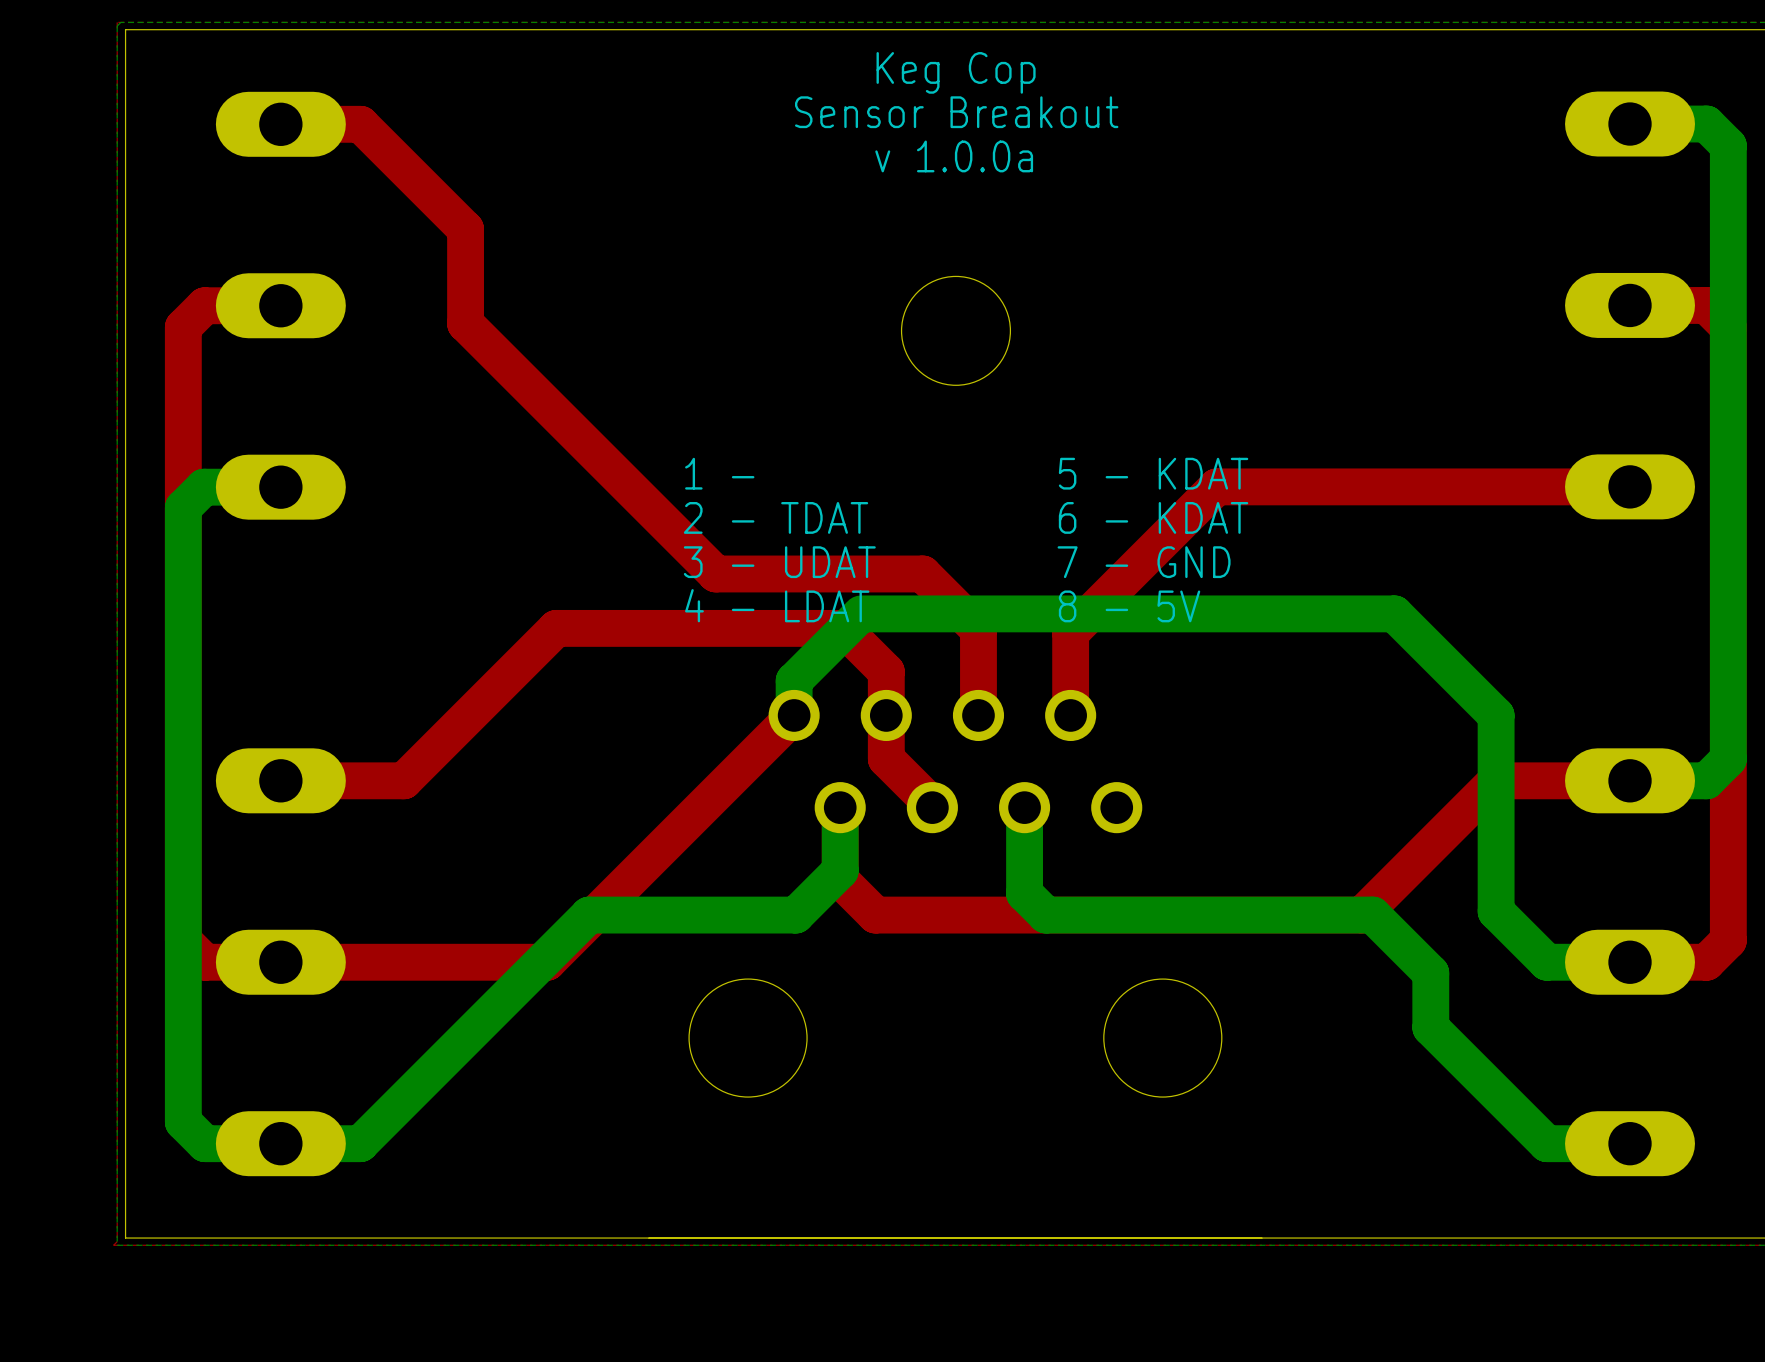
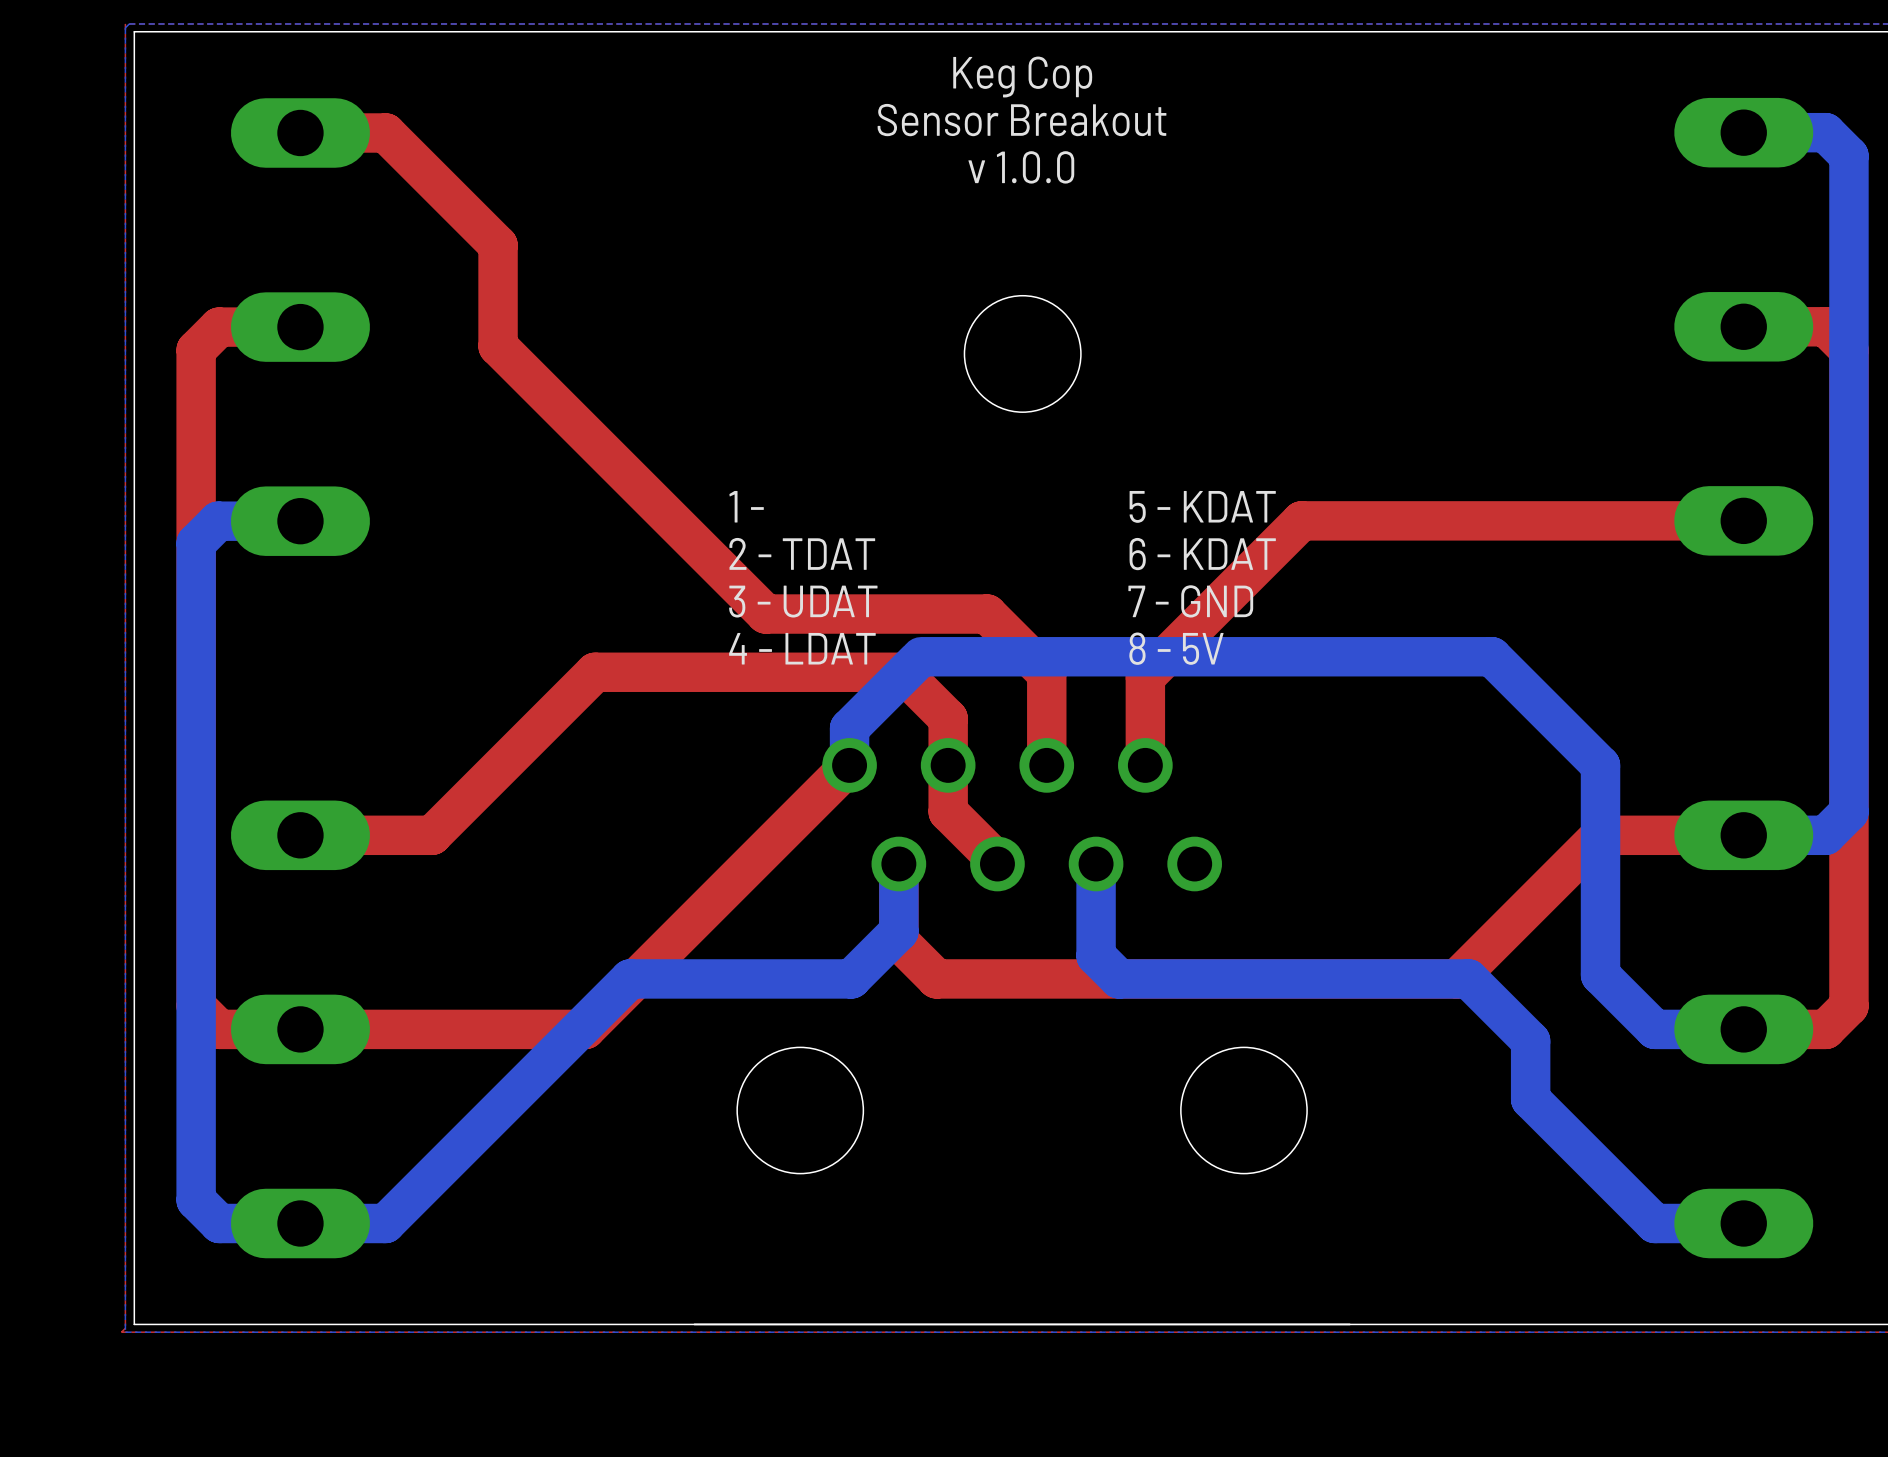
text: v 1.0.0a (954, 156) -> v 1.0.0 (1021, 167)

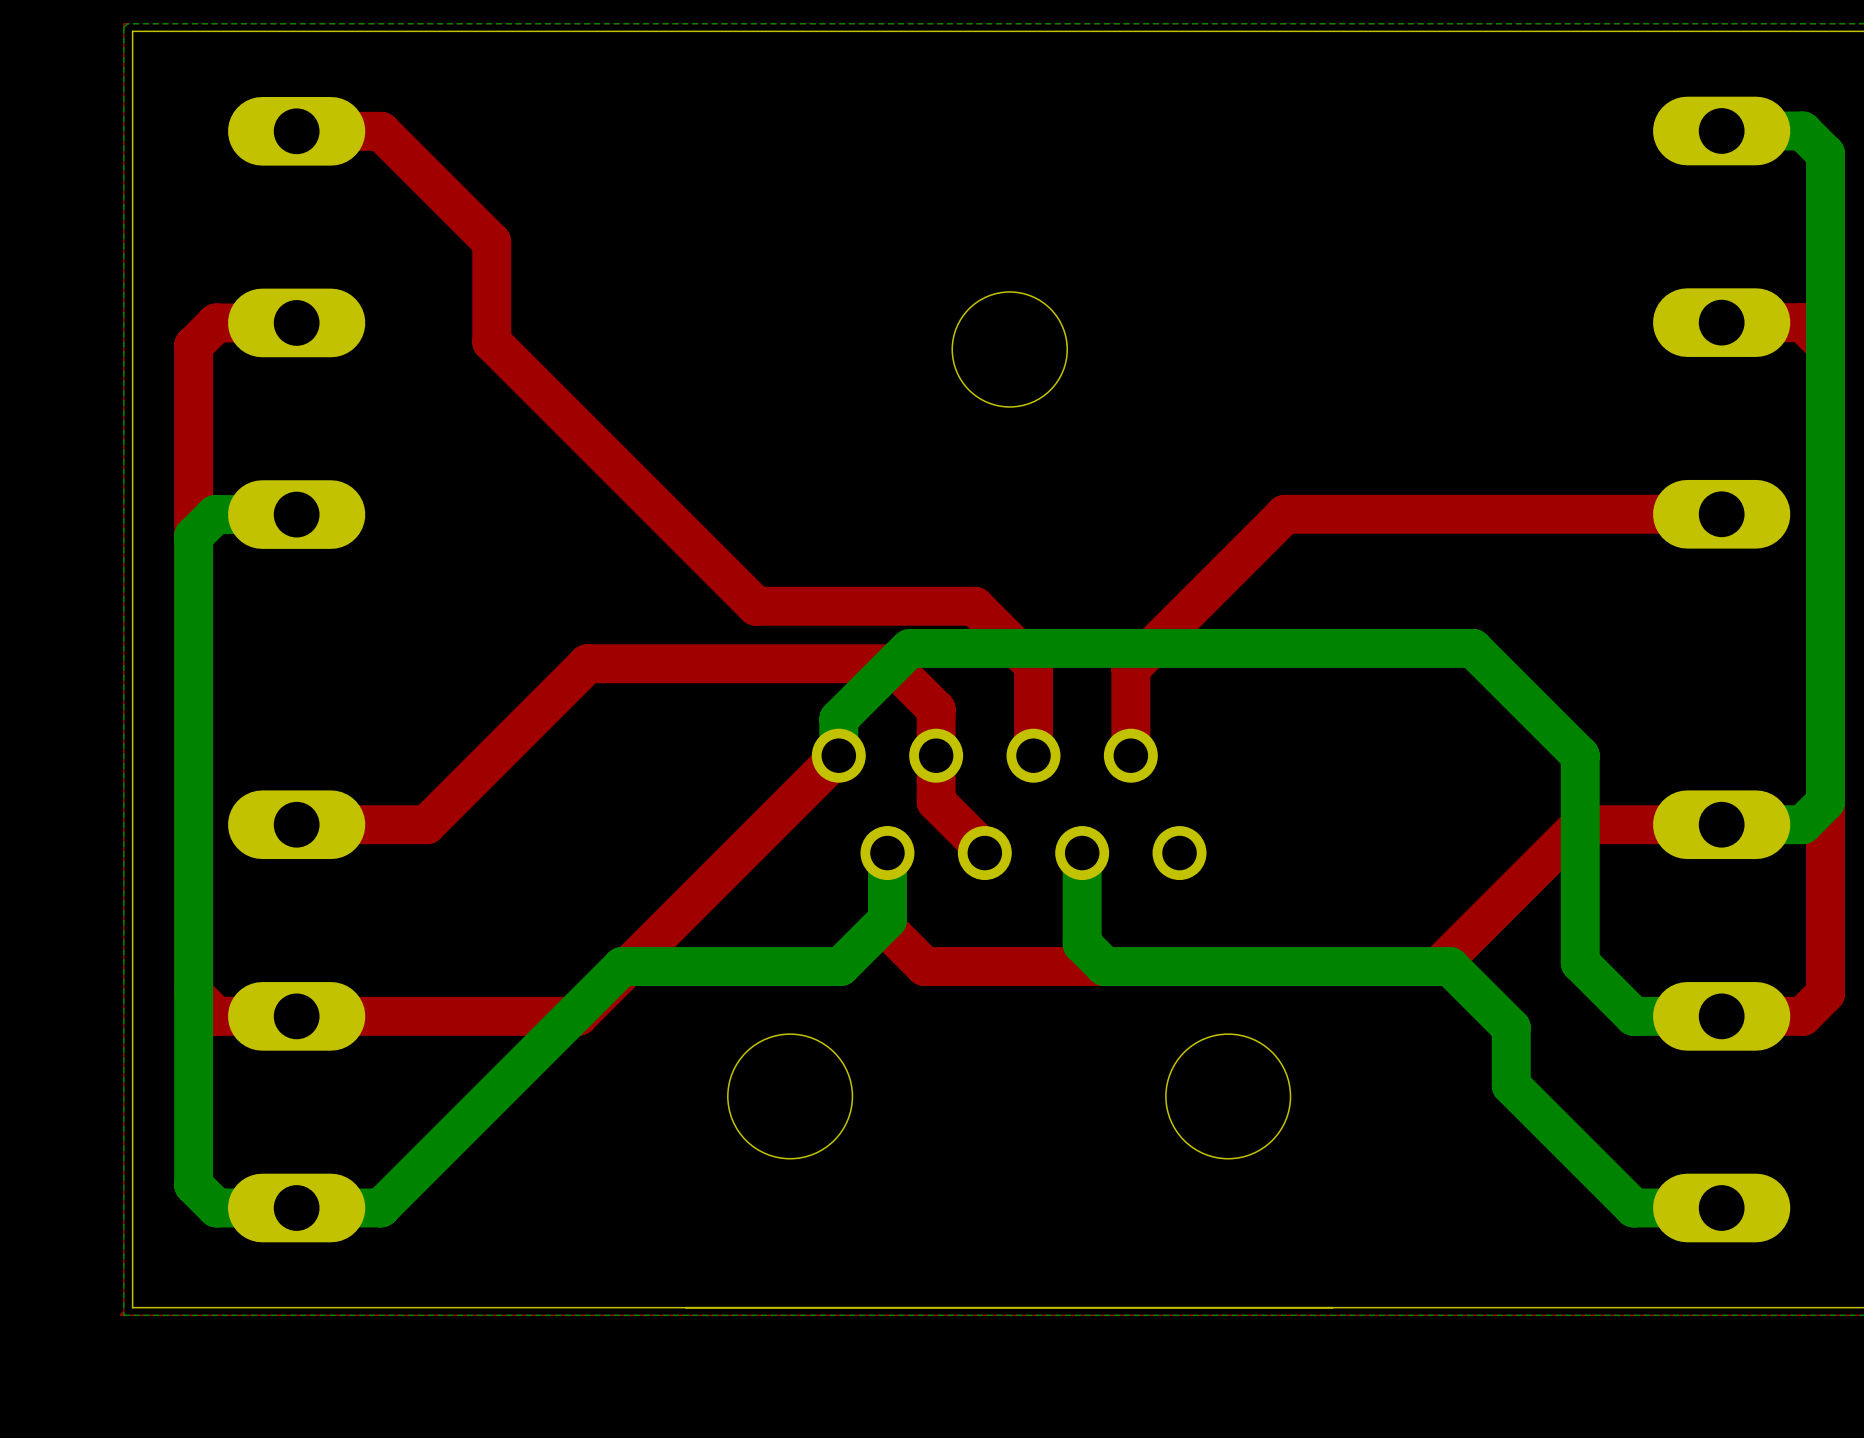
text: Keg Cop (1022, 77) -> none
text: Sensor Breakout (1022, 120) -> none
text: v 1.0.0 (1021, 167) -> none
text: 1 - (746, 506) -> none
text: 5 - KDAT (1202, 506) -> none
text: 2 - TDAT (802, 553) -> none
text: 6 - KDAT (1202, 554) -> none
text: 3 - UDAT (803, 601) -> none
text: 7 - GND (1190, 601) -> none
text: 4 - LDAT (802, 648) -> none
text: 8 - 5V (1176, 648) -> none

